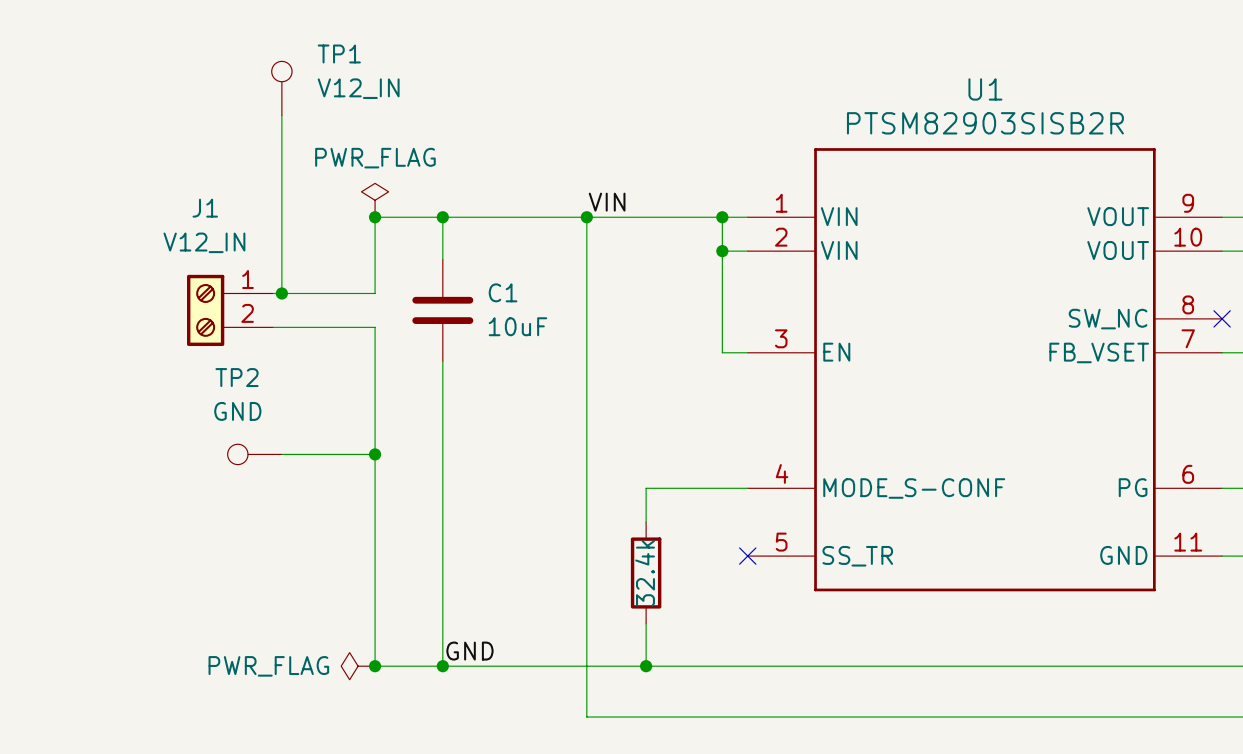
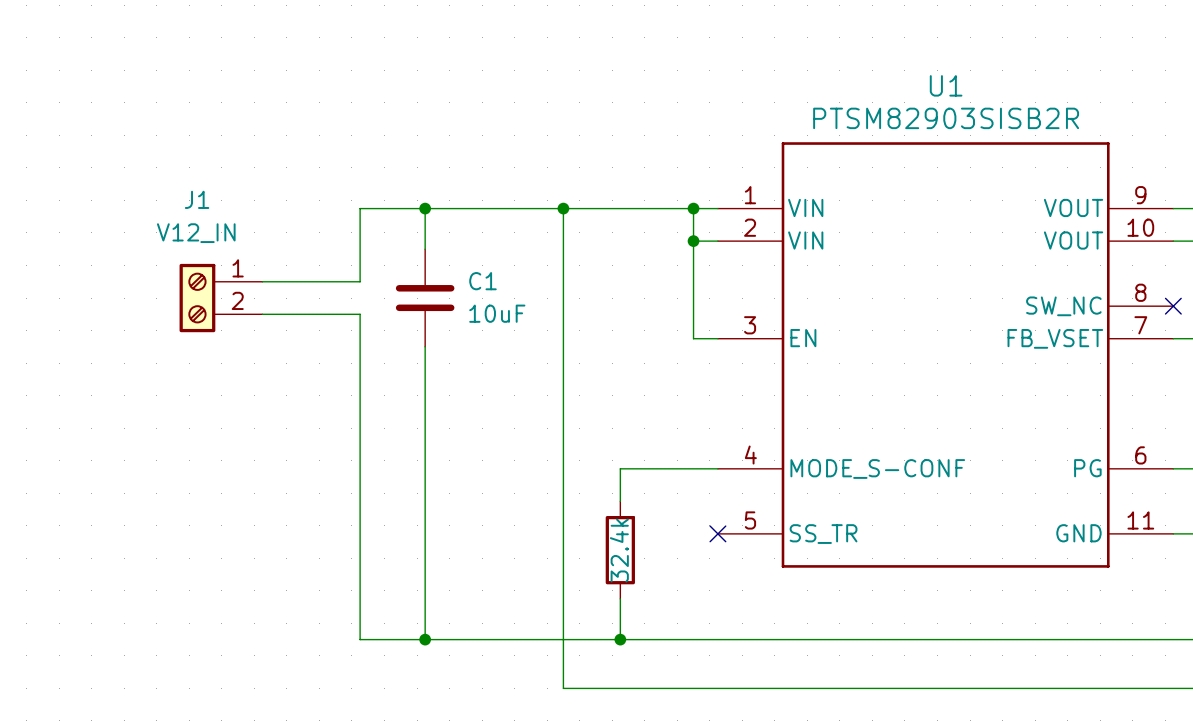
TP1: V12_IN (281, 88) -> none
wire: (281, 115) (281, 293) -> none
power symbol: PWR_FLAG (375, 200) -> none
label: VIN (607, 202) -> none
junction: (375, 217) -> none
junction: (281, 293) -> none
TP2: GND (254, 454) -> none
wire: (281, 454) (375, 454) -> none
junction: (375, 454) -> none
label: GND (469, 651) -> none
power symbol: PWR_FLAG (358, 666) -> none
junction: (375, 666) -> none

